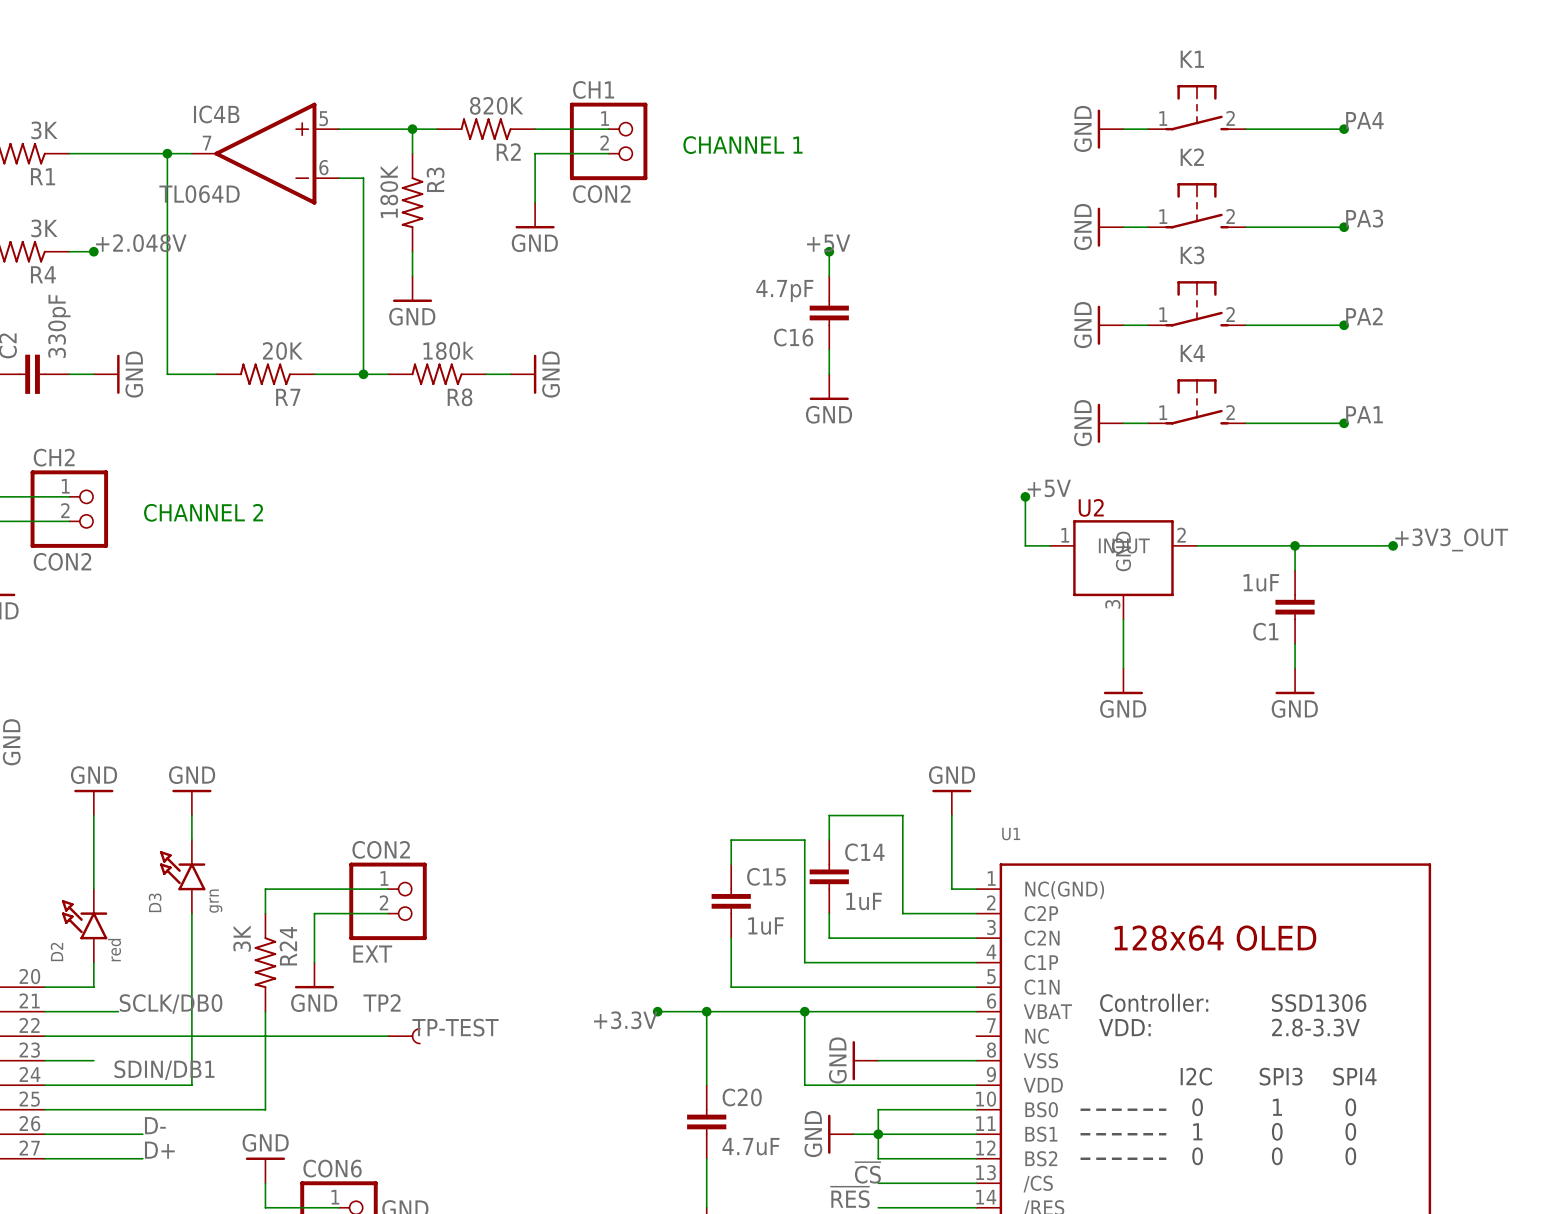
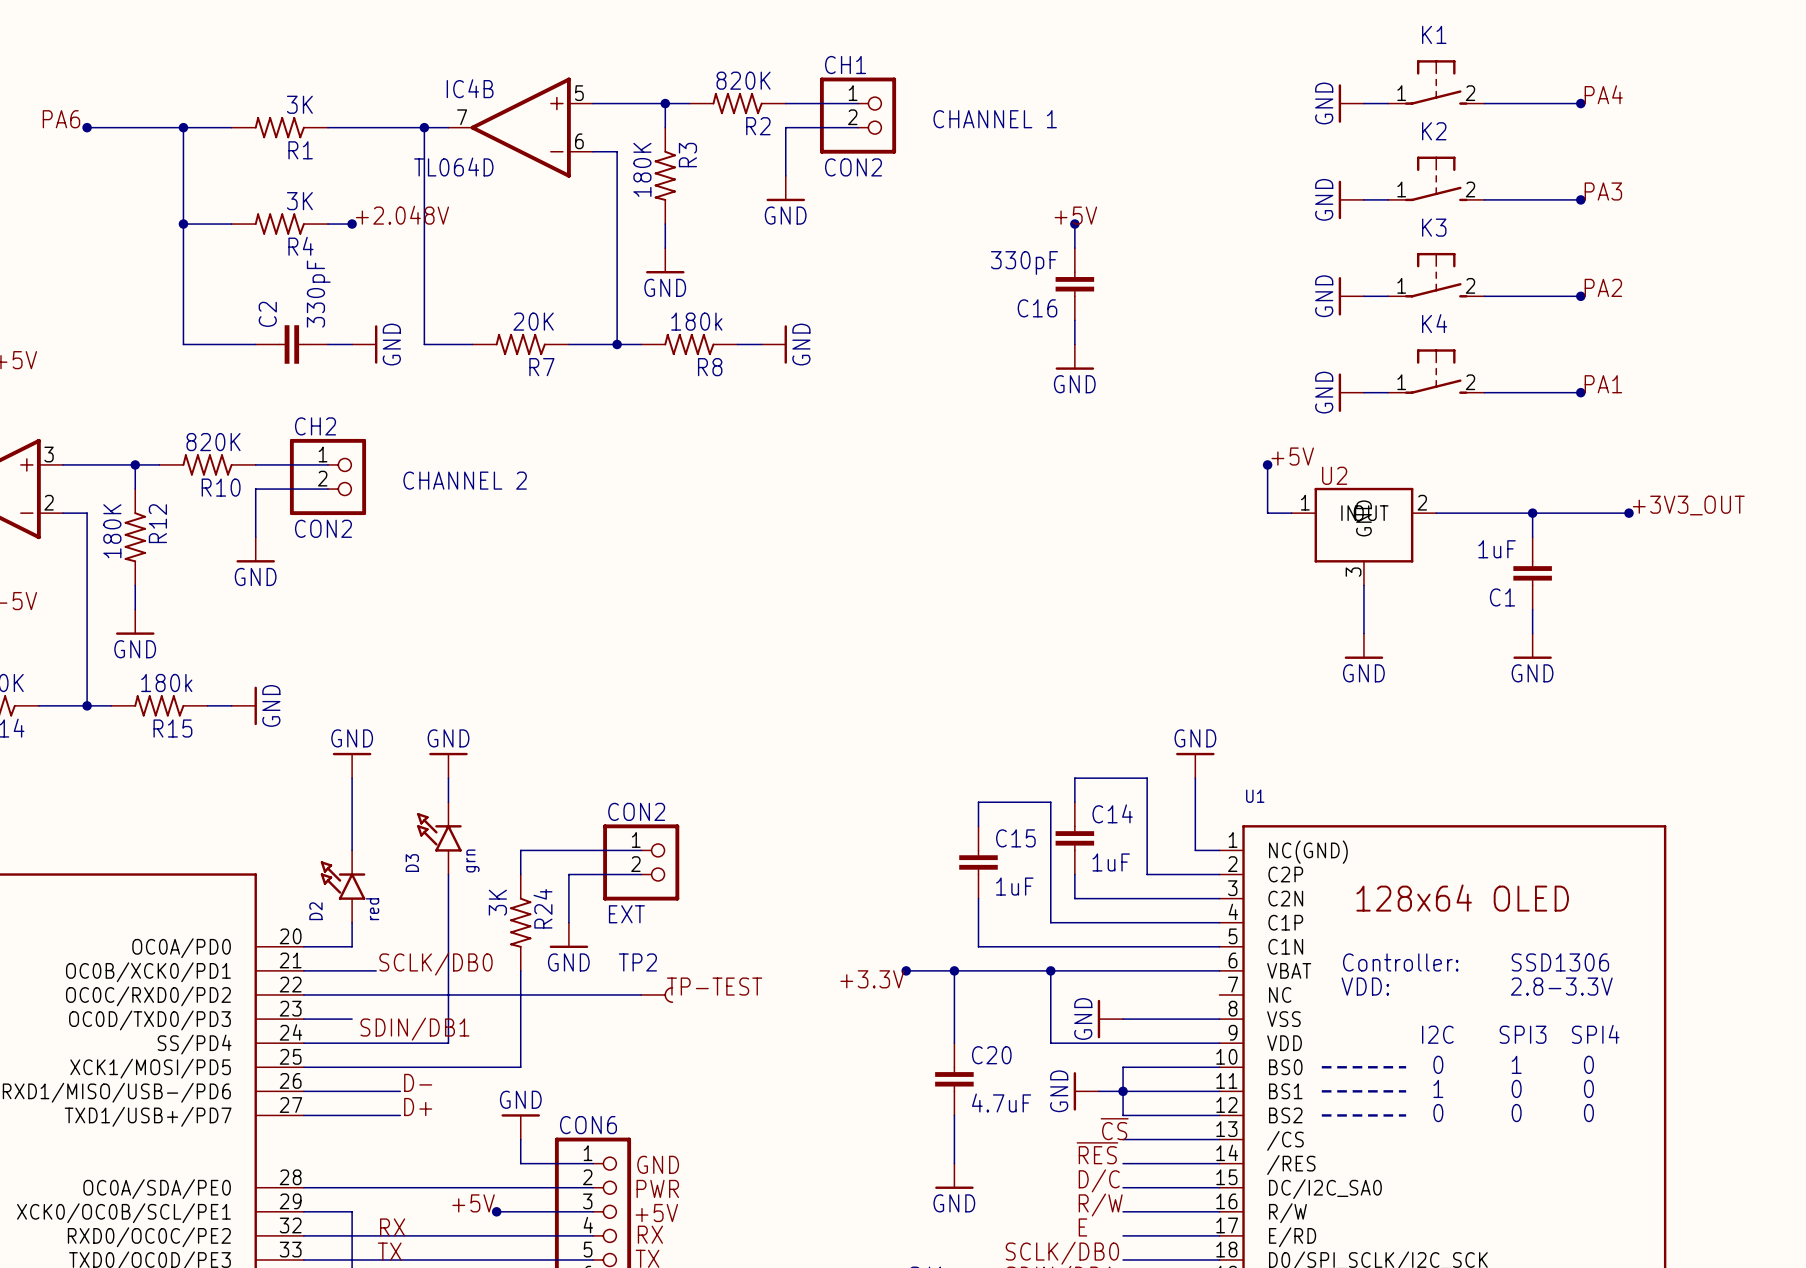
C16 value: 4.7pF (784, 290) -> 330pF (1024, 262)

